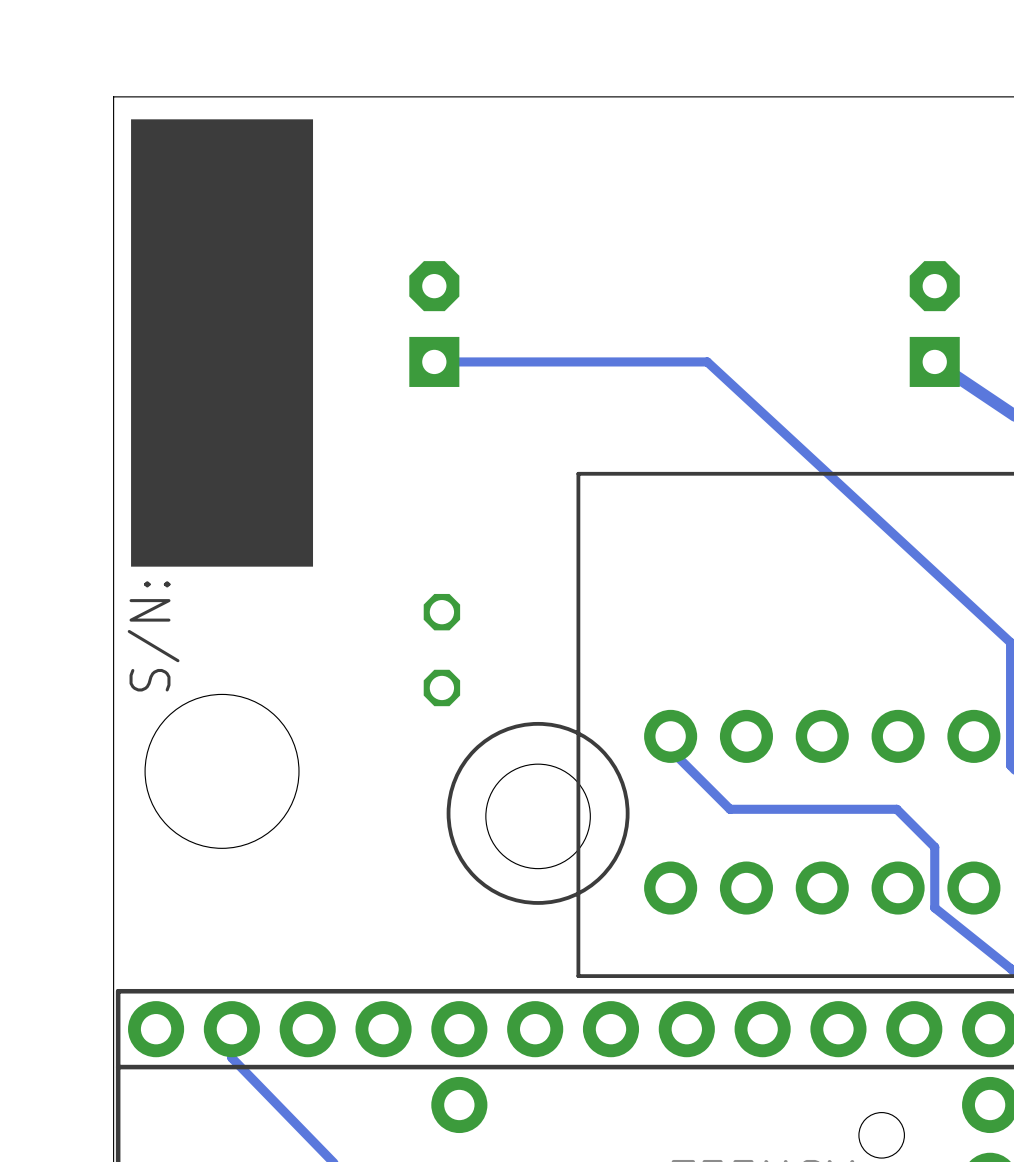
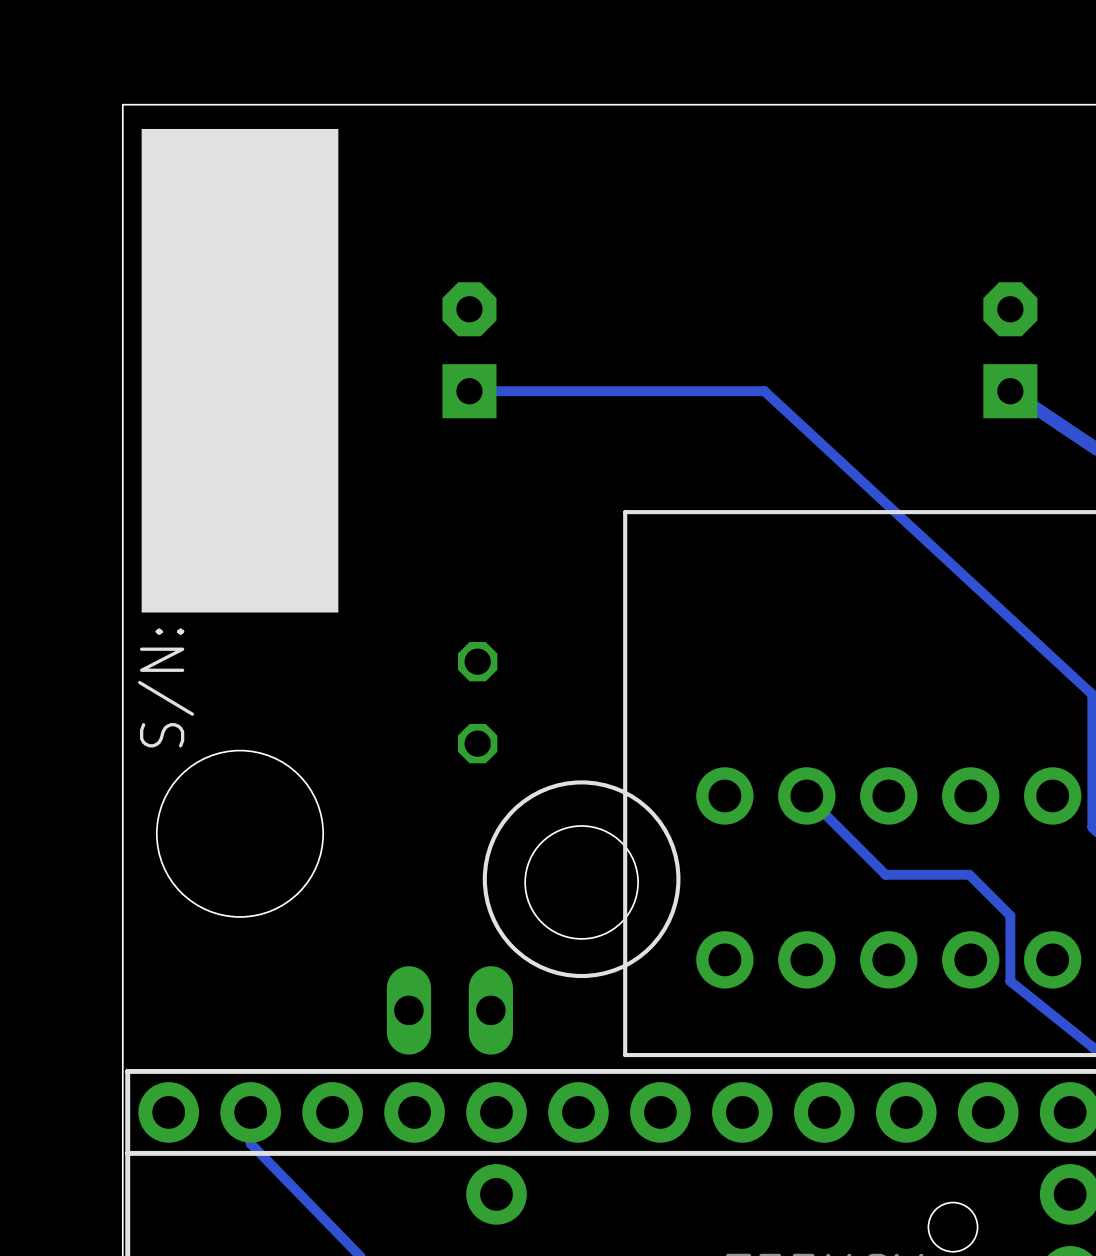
track: (670, 736) (670, 749) (730, 809) (819, 809) -> (806, 795) (885, 874)
part: none -> (449, 1010)

